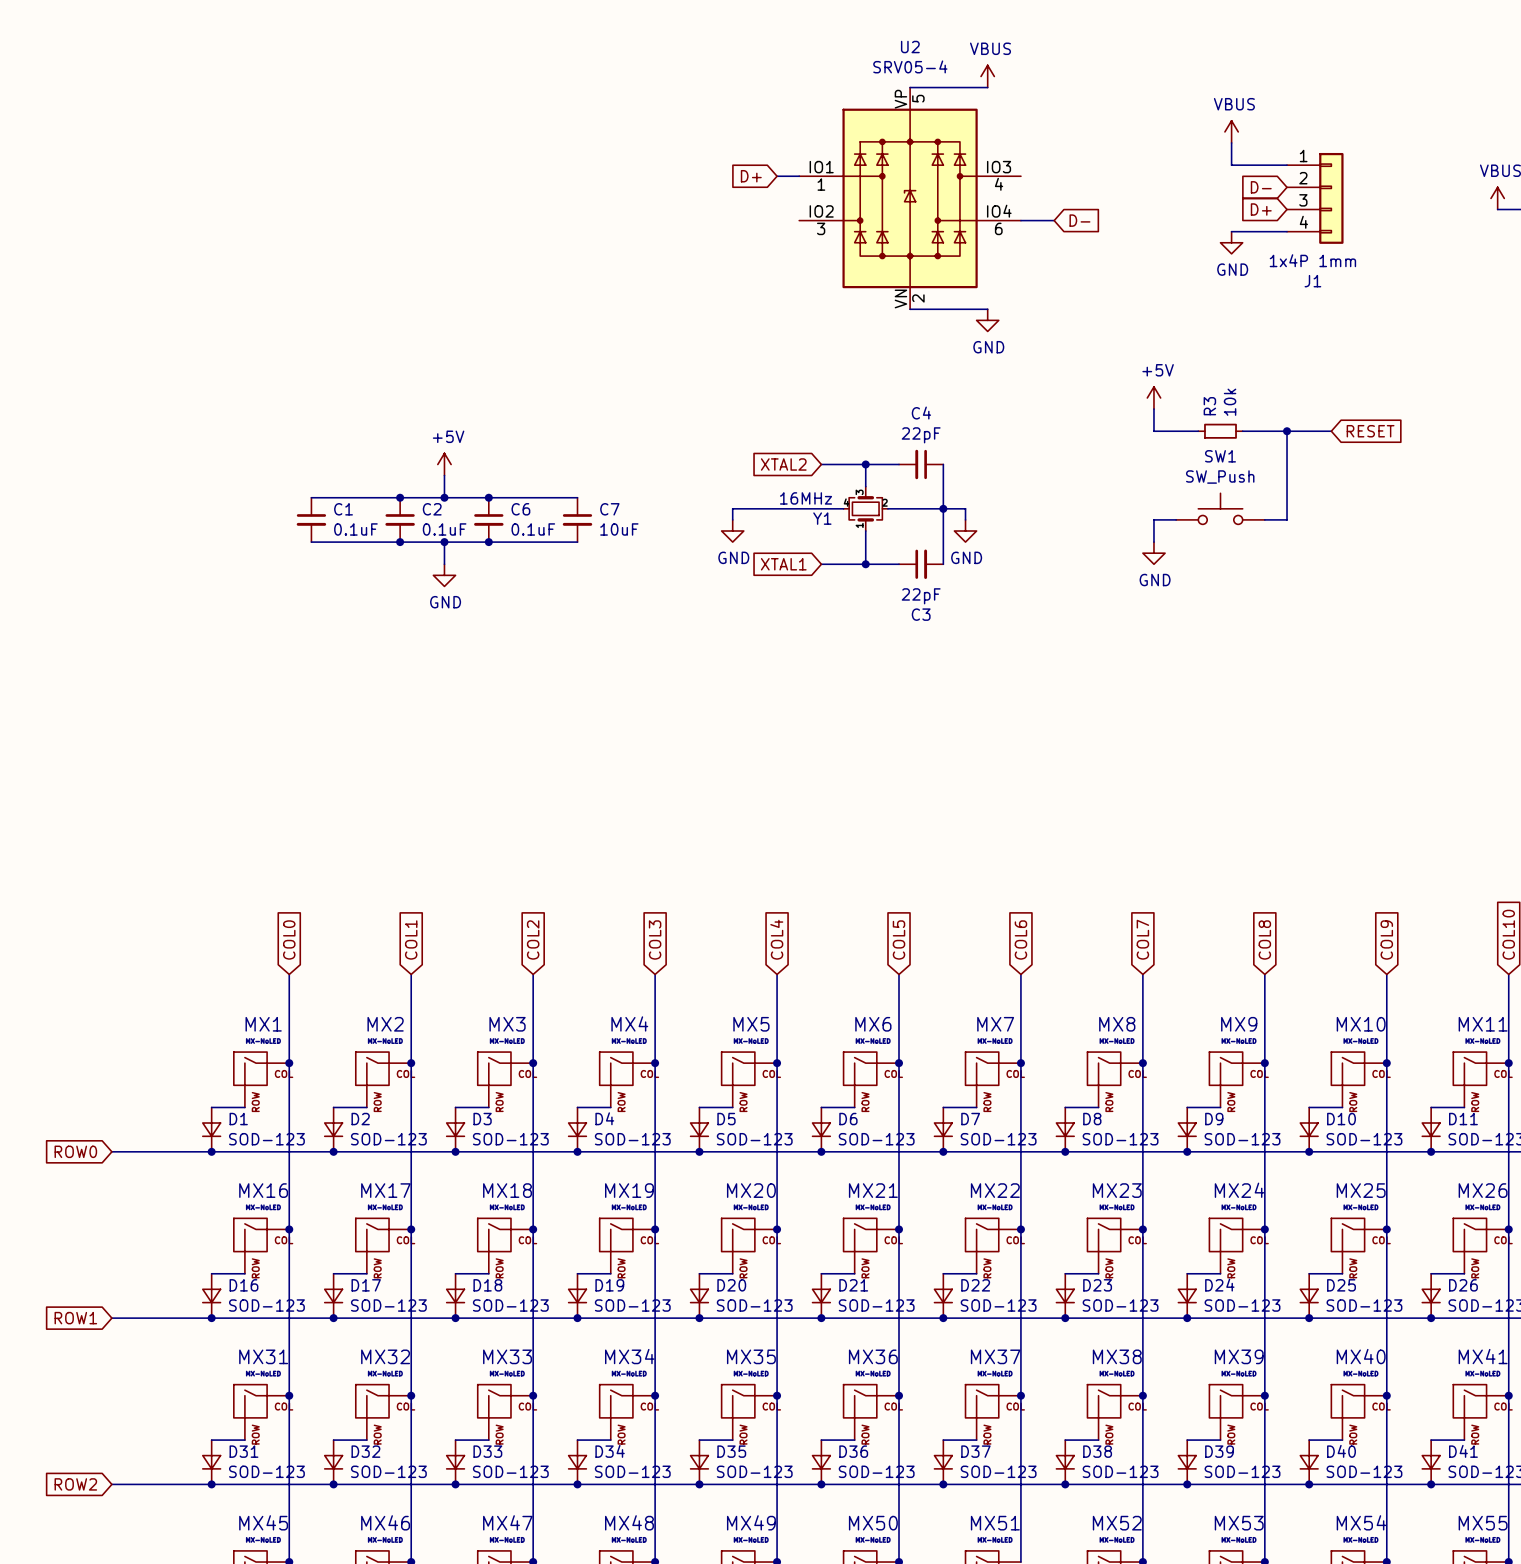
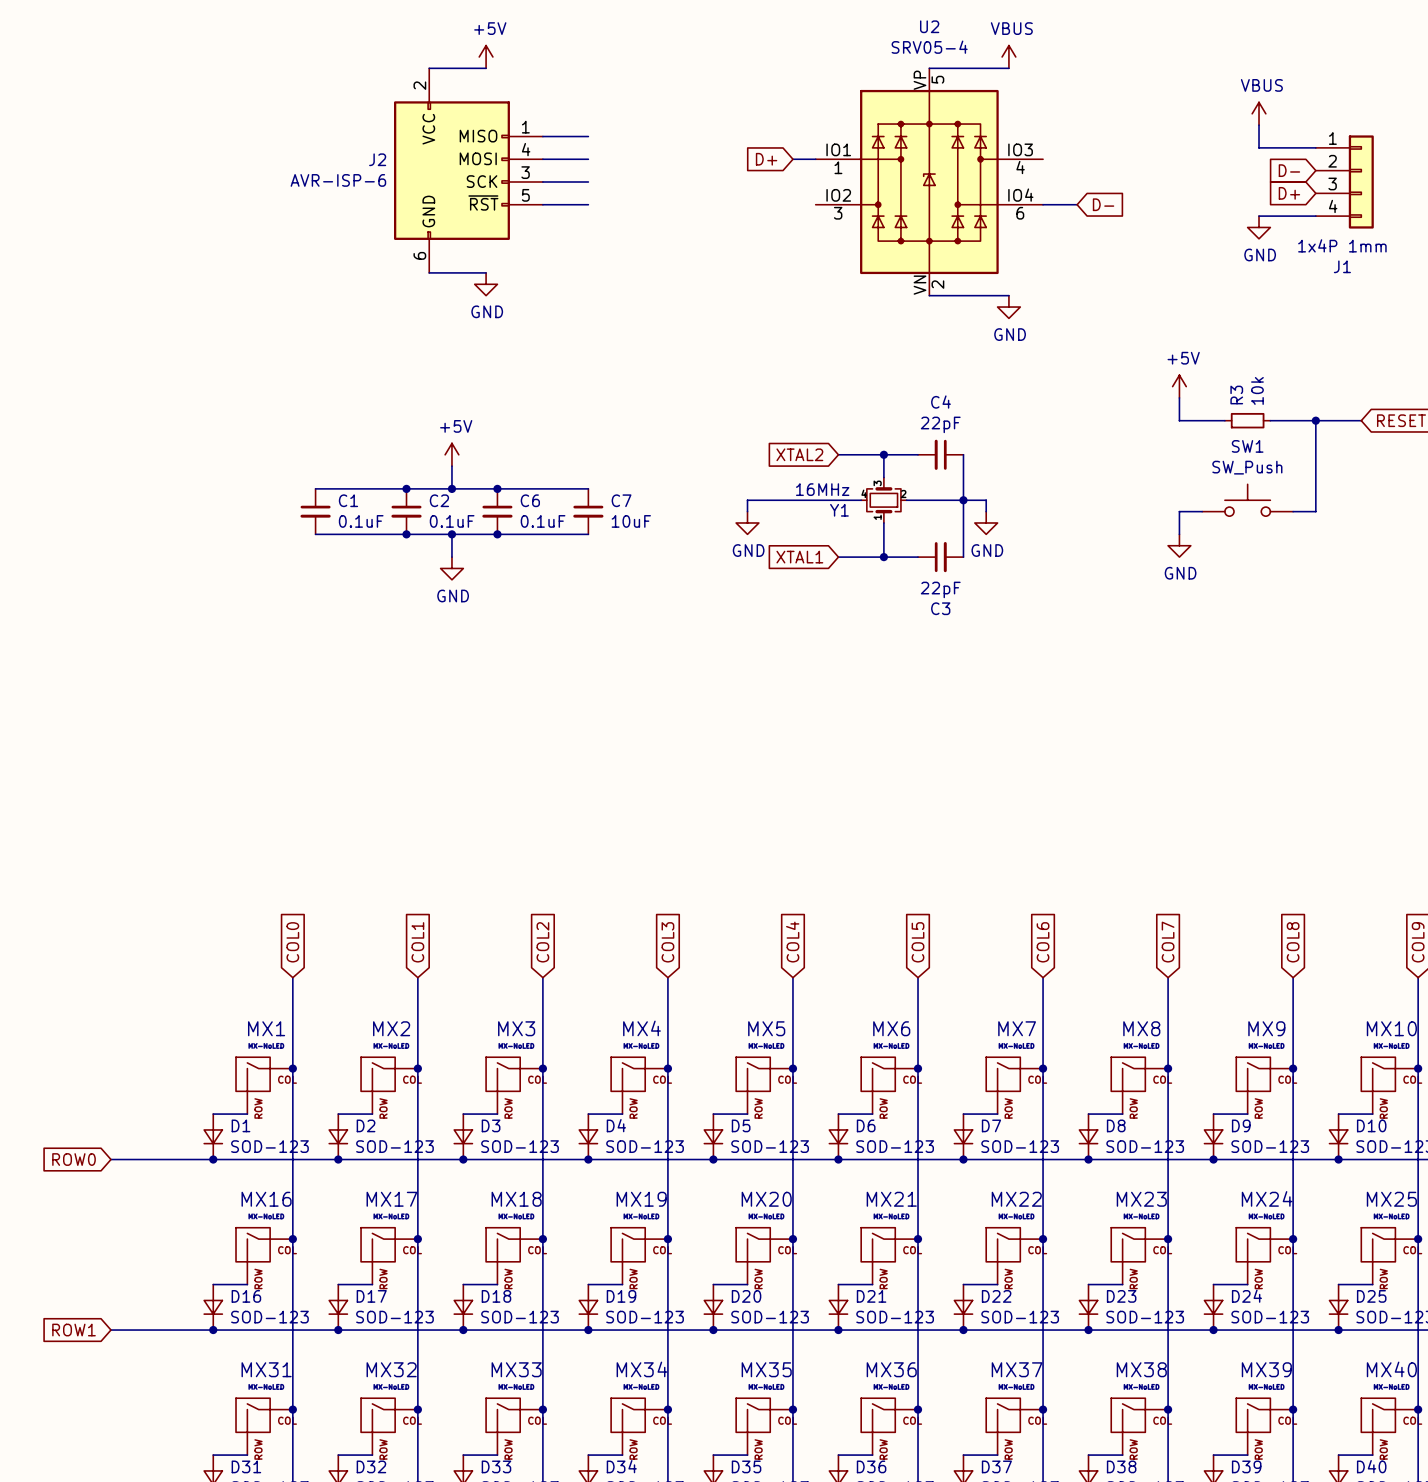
power symbol: none -> +5V (486, 56)
wire: none -> (429, 68) (486, 68)
wire: none -> (542, 136) (588, 136)
wire: none -> (542, 159) (588, 159)
J2: none -> AVR-ISP-6 (468, 170)
wire: none -> (542, 181) (588, 181)
wire: none -> (542, 204) (588, 204)
wire: none -> (429, 272) (486, 272)
power symbol: none -> GND (486, 284)

